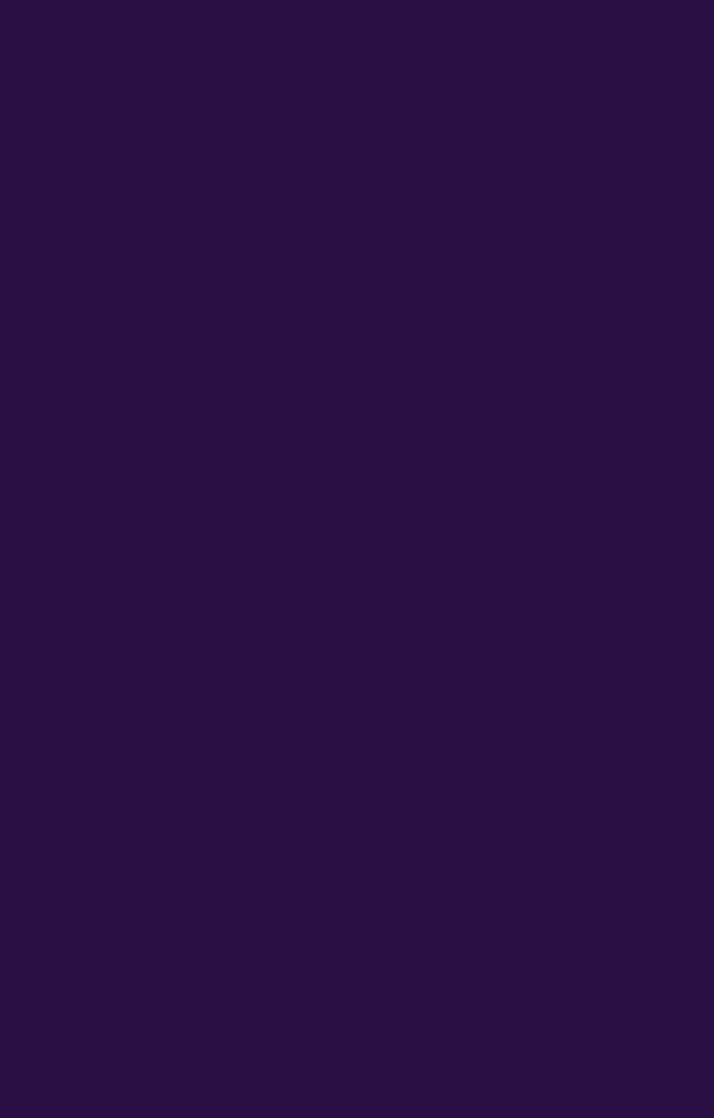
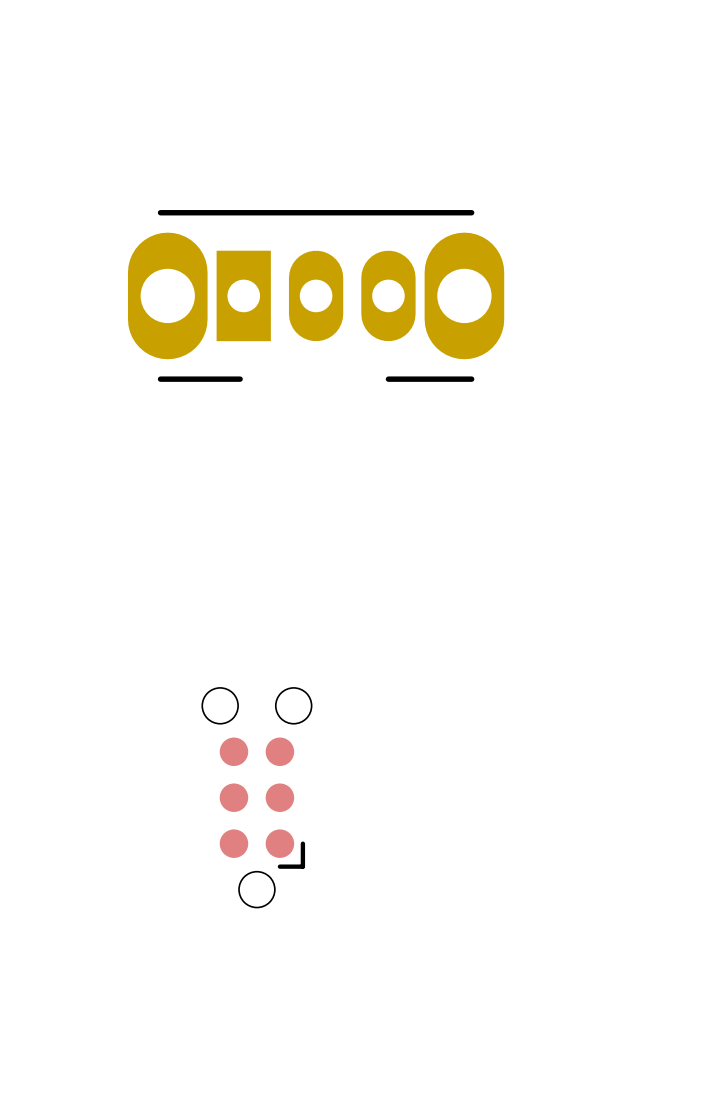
part: none -> (316, 295)
part: none -> (256, 797)

